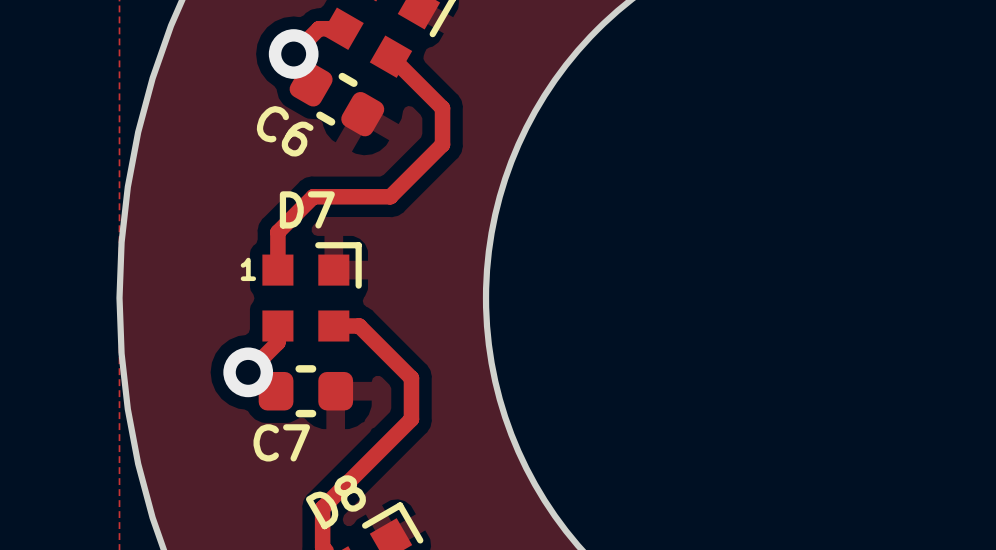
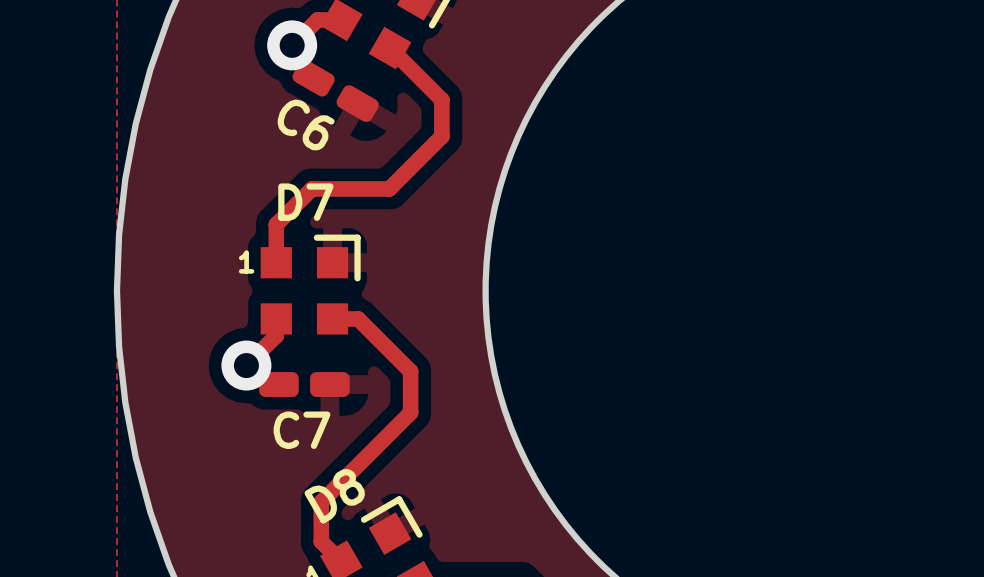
C6 footprint: [289, 62, 385, 137] -> [292, 59, 379, 123]
C7 footprint: [258, 365, 354, 418] -> [259, 372, 350, 398]

